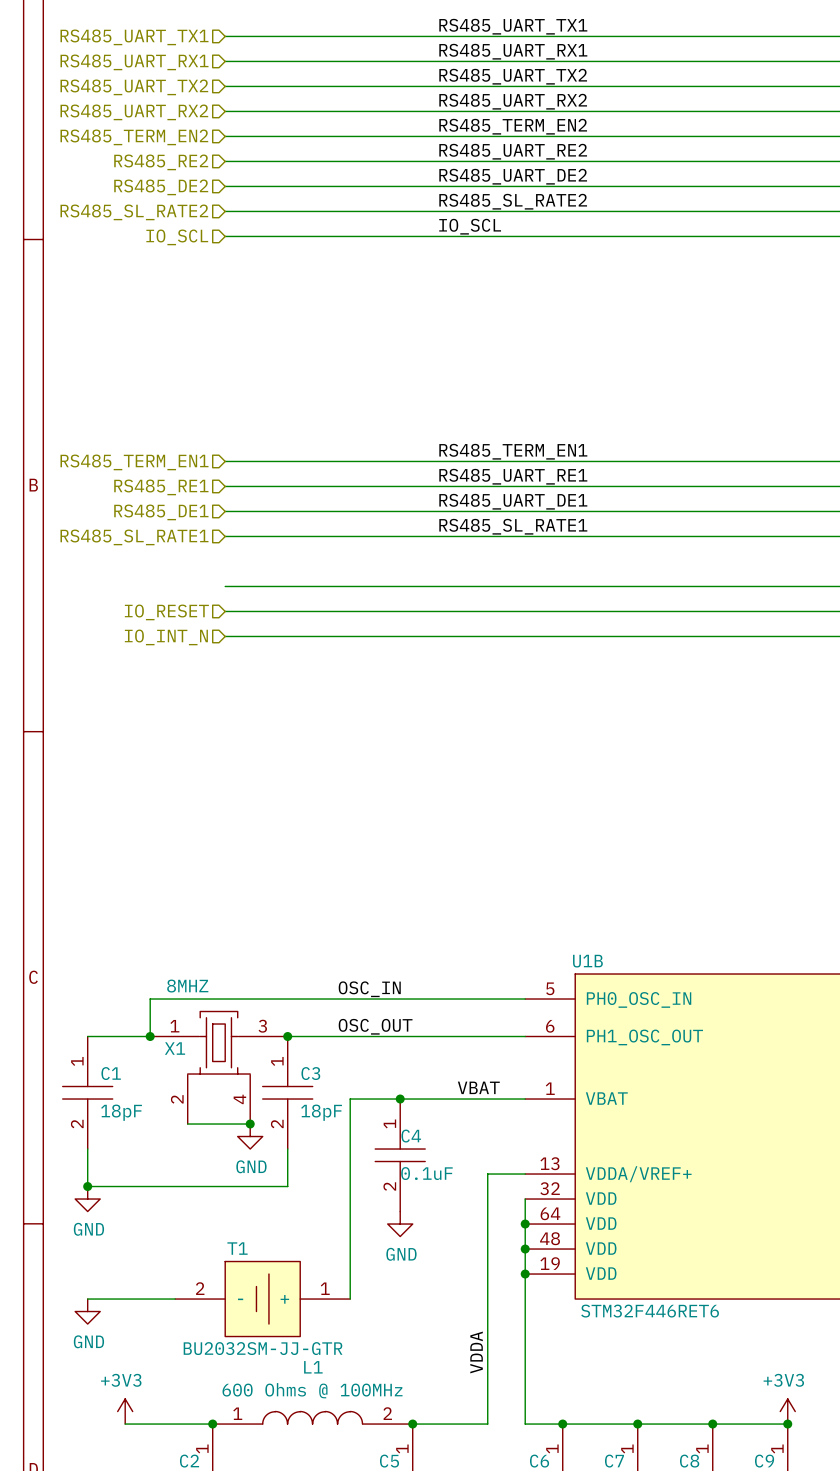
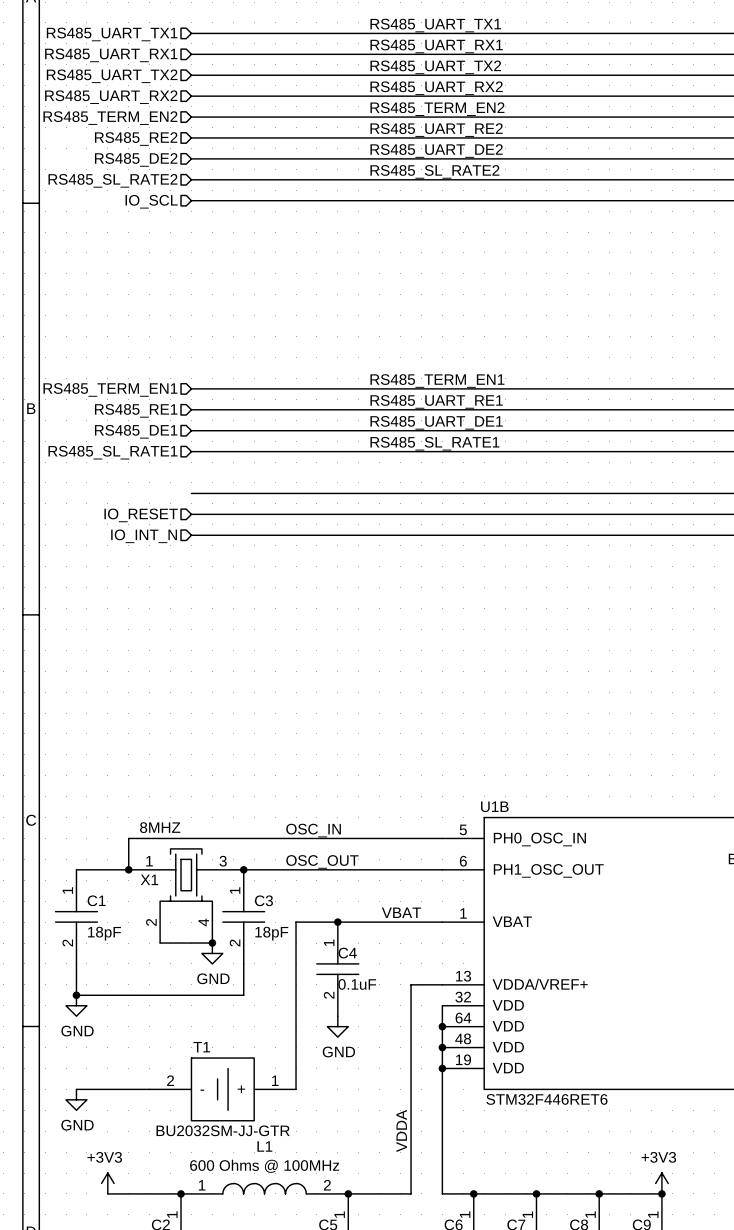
label: IO_SCL (470, 226) -> none

